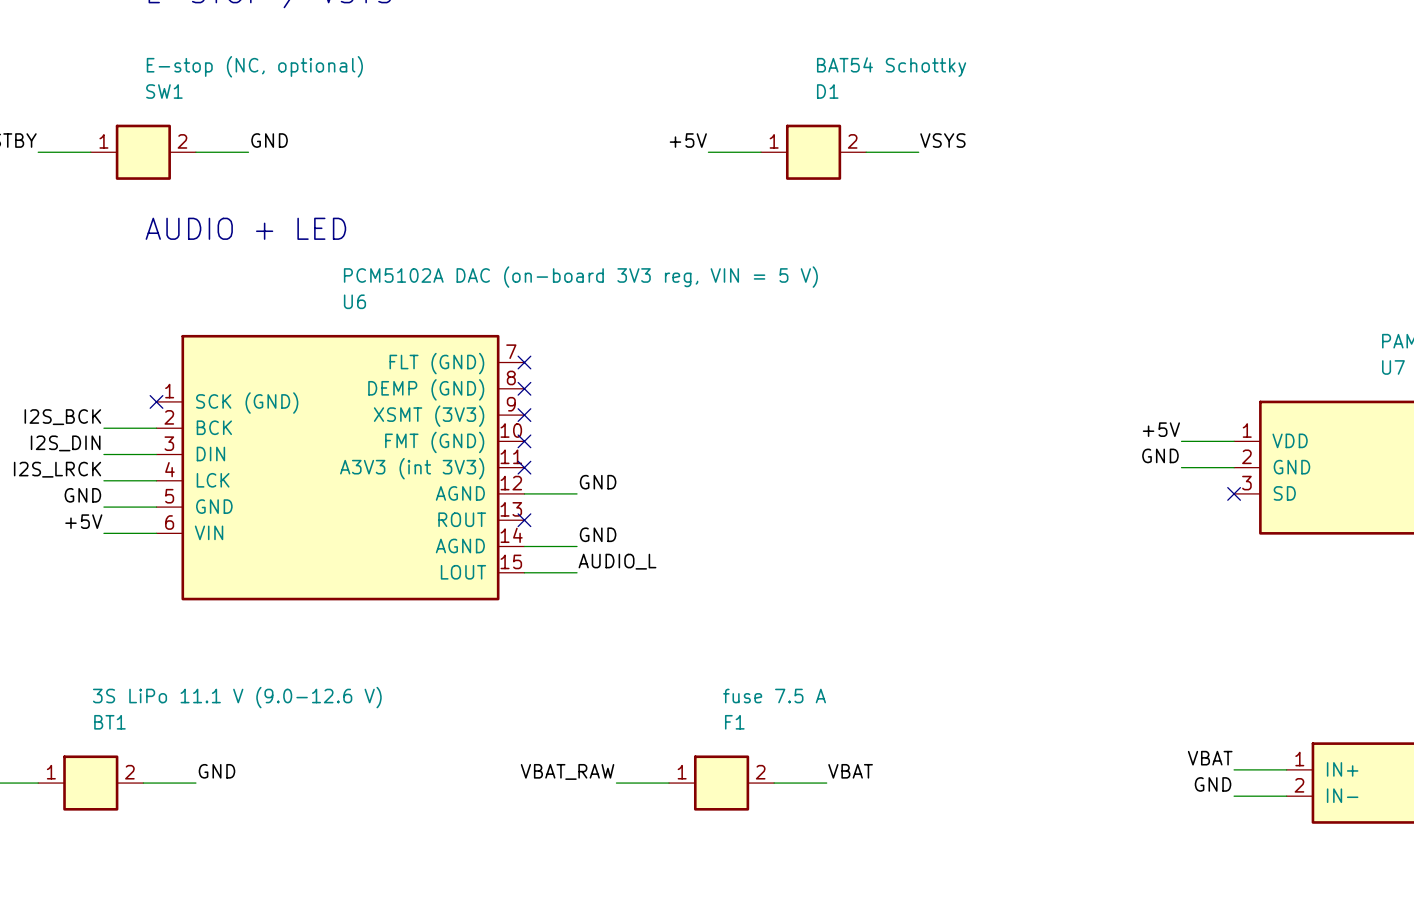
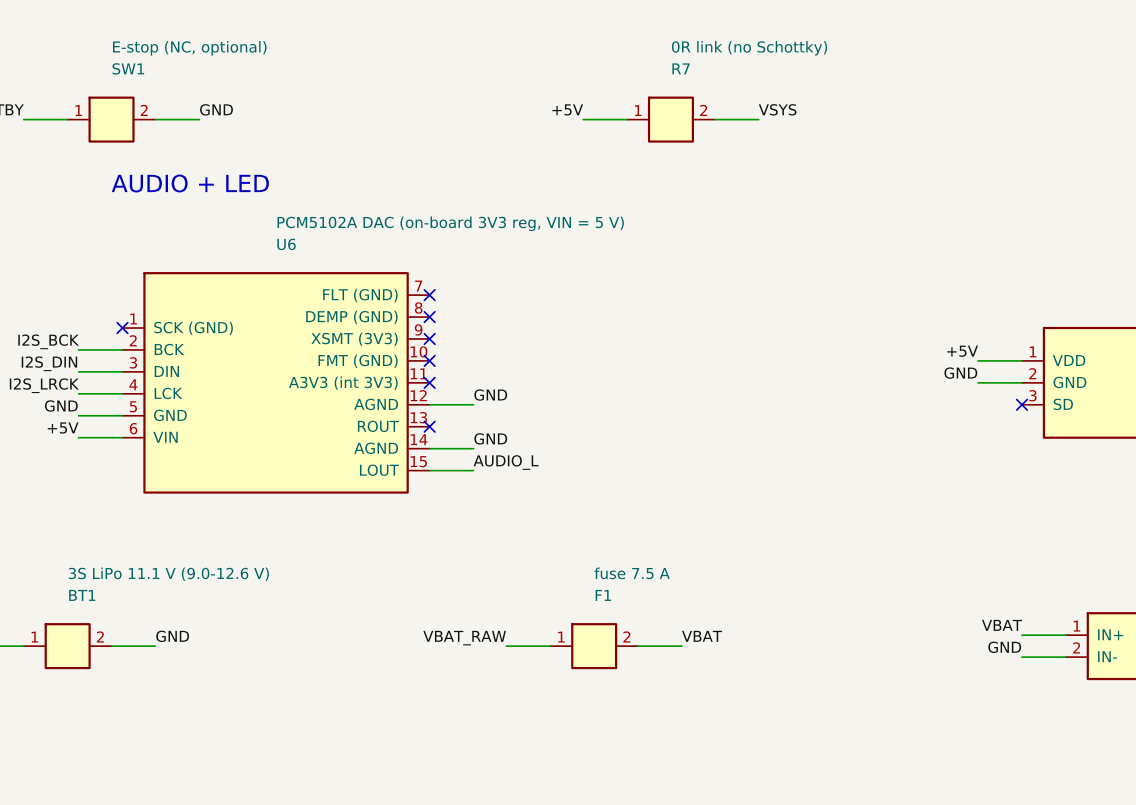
D1 value: BAT54 Schottky (891, 67) -> 0R link (no Schottky) (749, 48)
D1 name: D1 (827, 91) -> R7 (681, 68)

